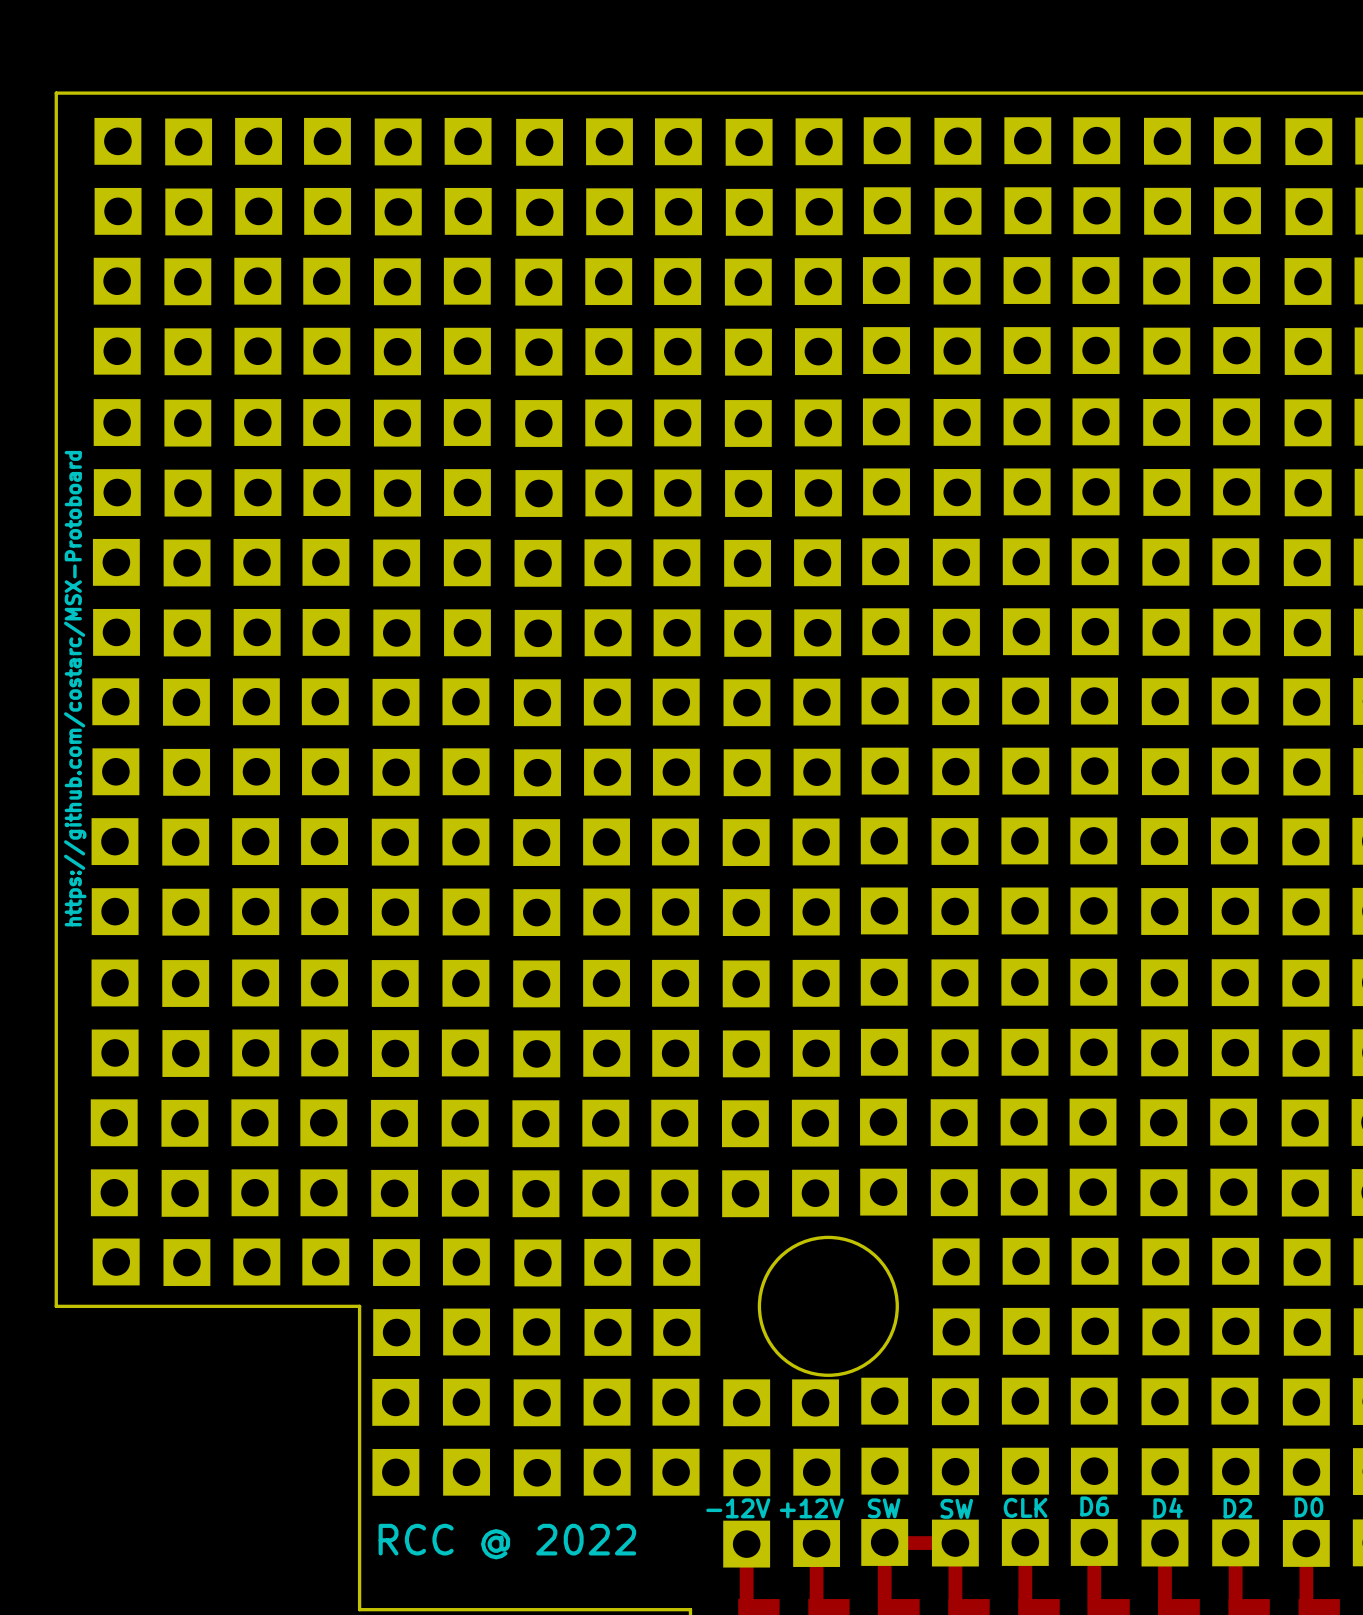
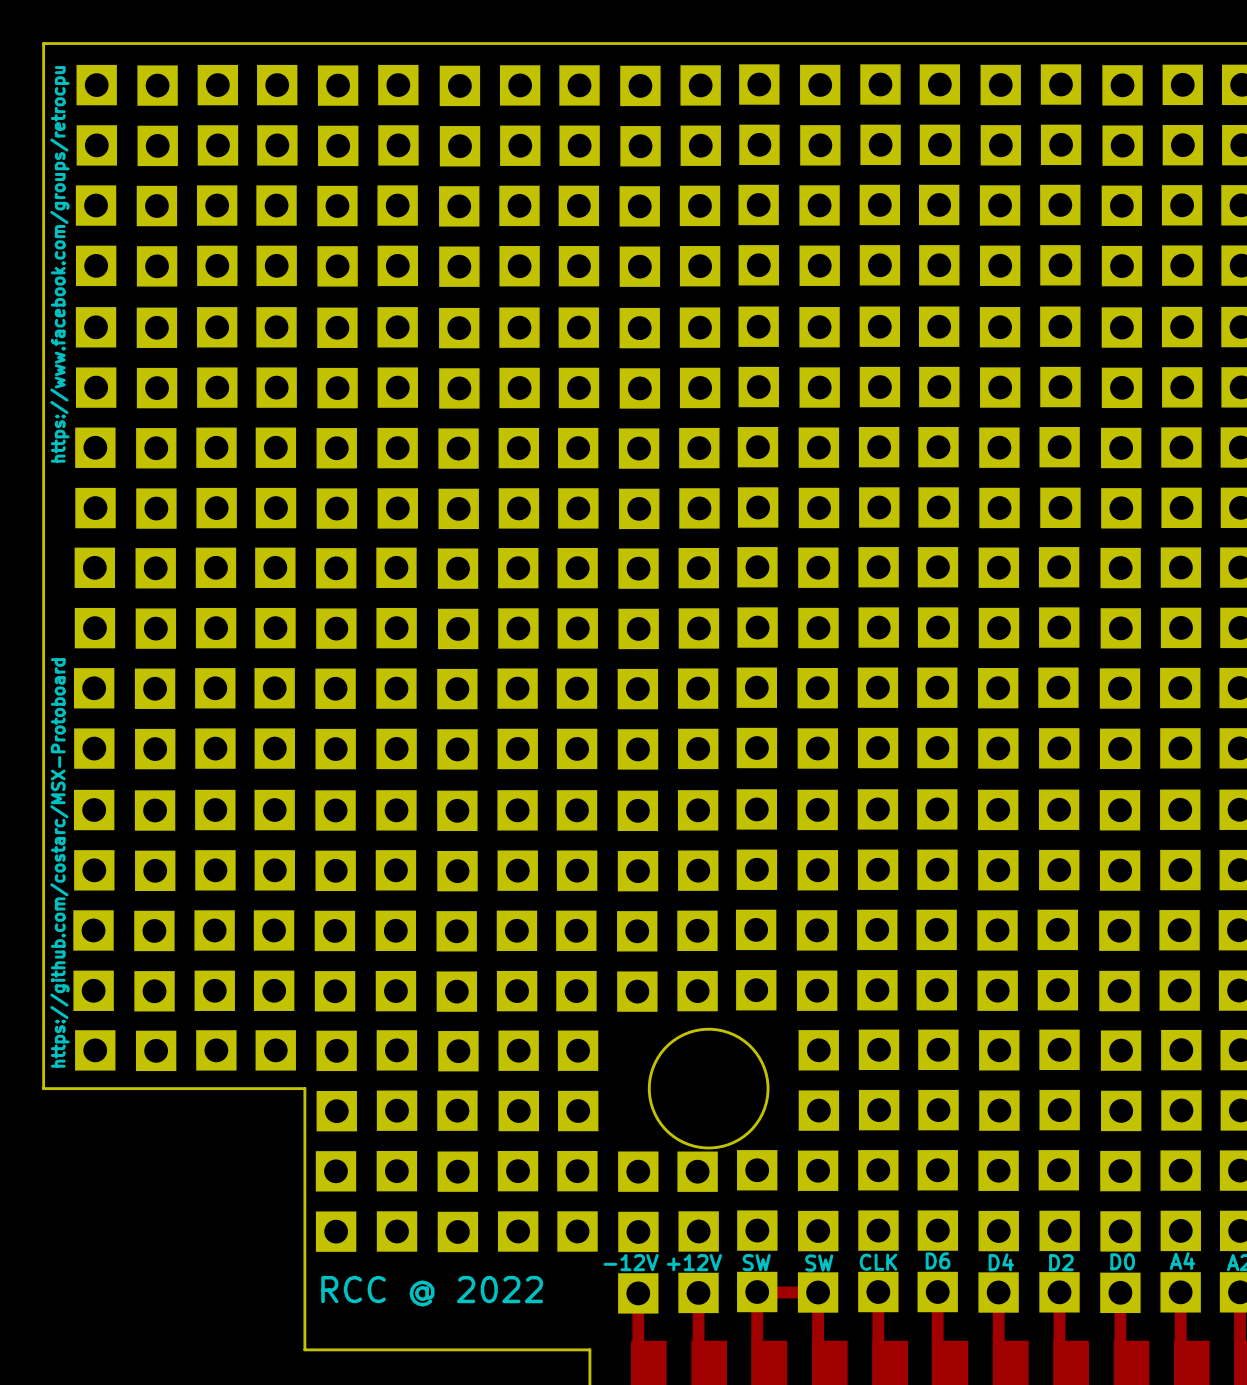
text: none -> https://www.facebook.com/groups/retrocpu (59, 264)
text position: https://github.com/costarc/MSX-Protoboard (75, 688) -> https://github.com/costarc/MSX-Protoboard (59, 862)

